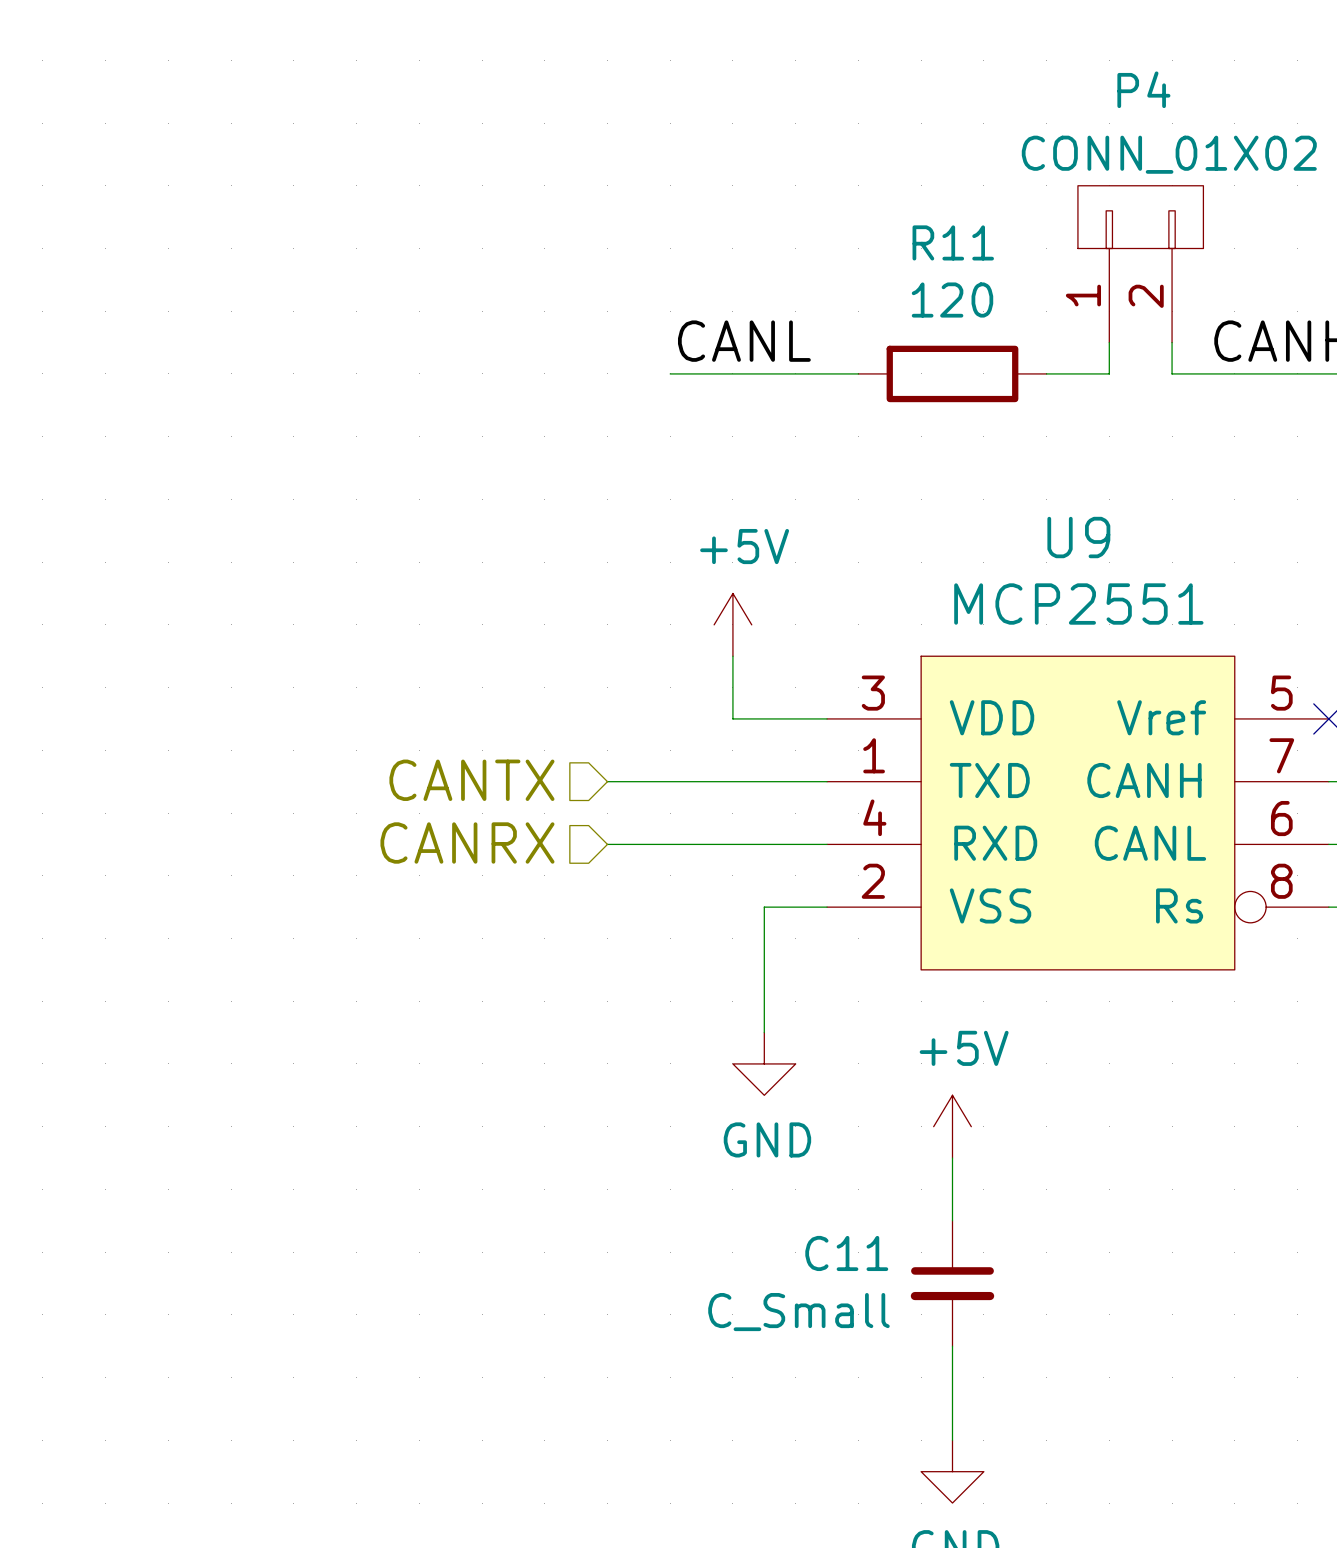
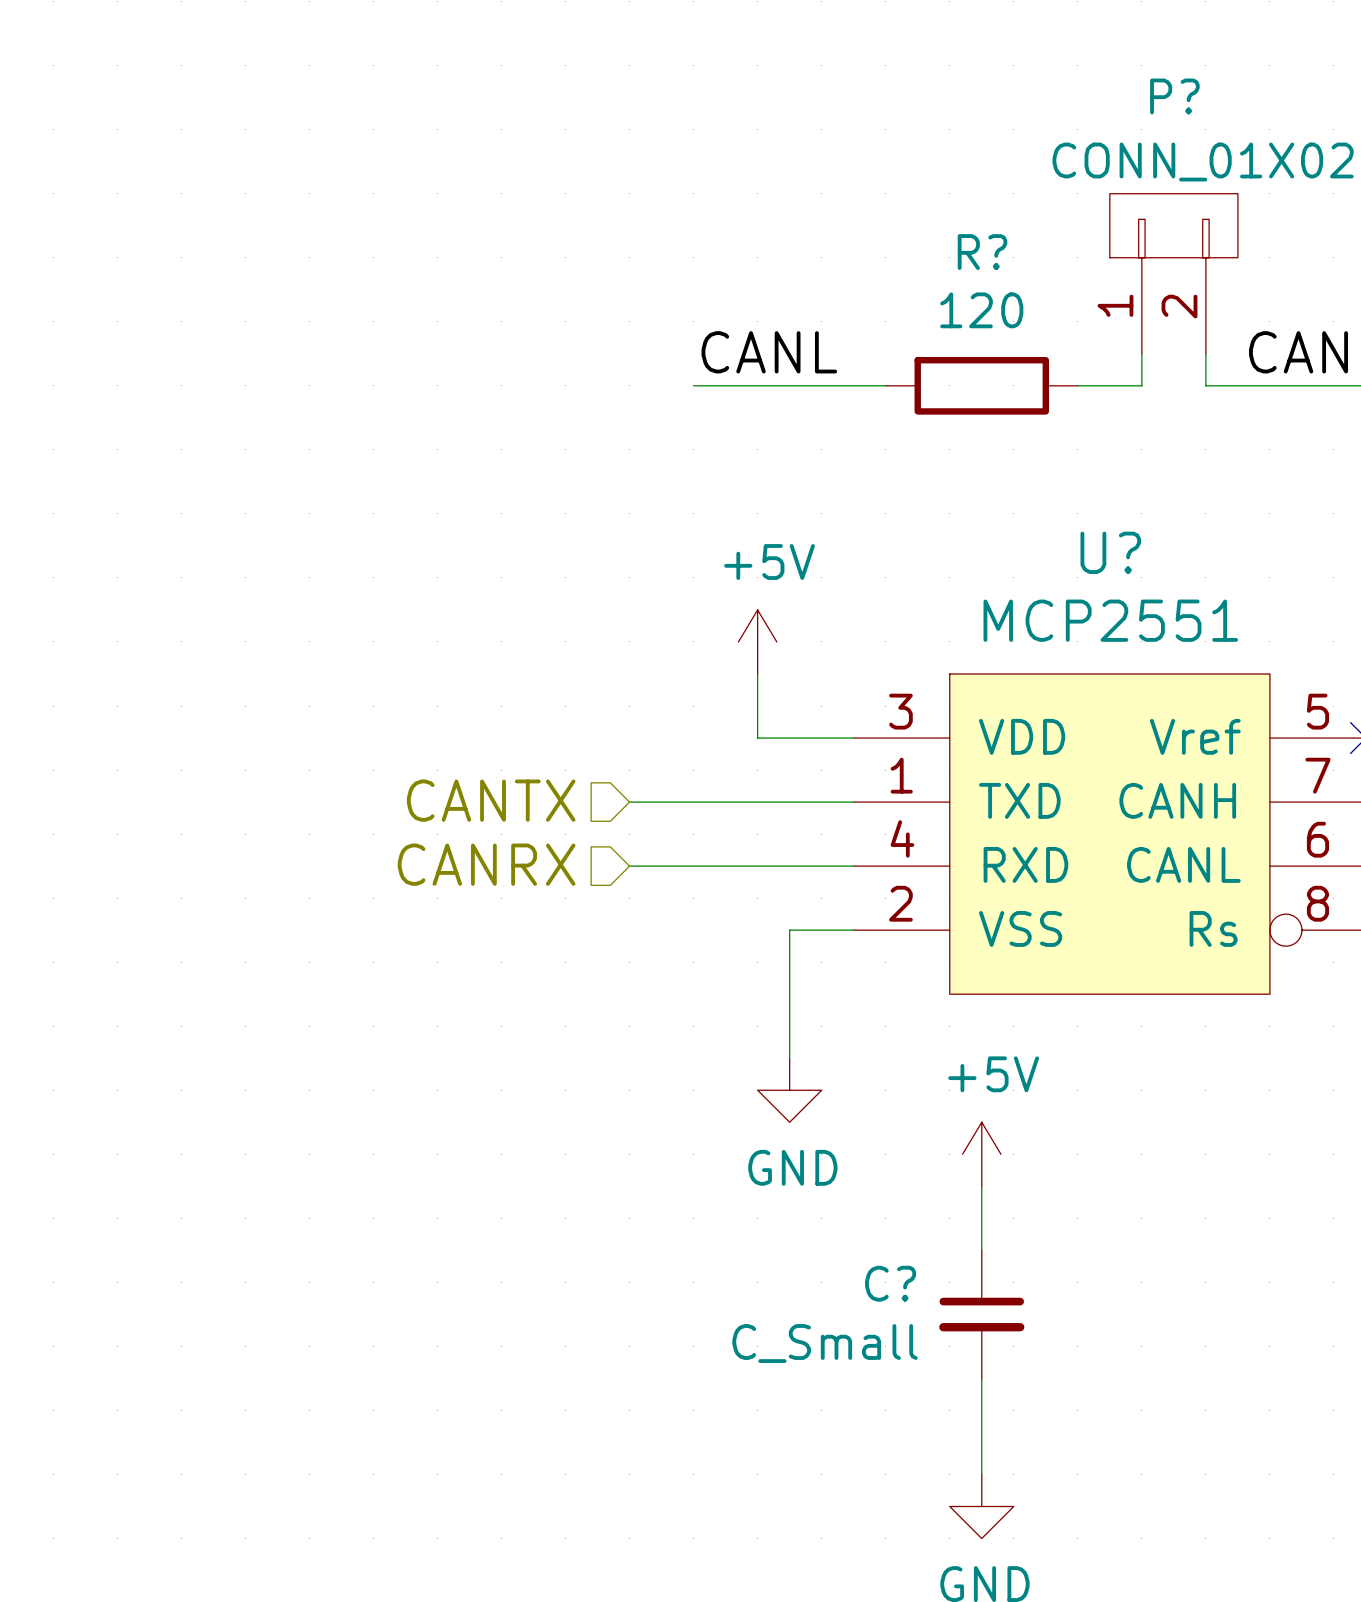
P4 name: P4 (1143, 89) -> P? (1174, 96)
R11 name: R11 (953, 242) -> R? (982, 252)
U9 name: U9 (1078, 537) -> U? (1110, 552)
C11 name: C11 (846, 1253) -> C? (890, 1283)

